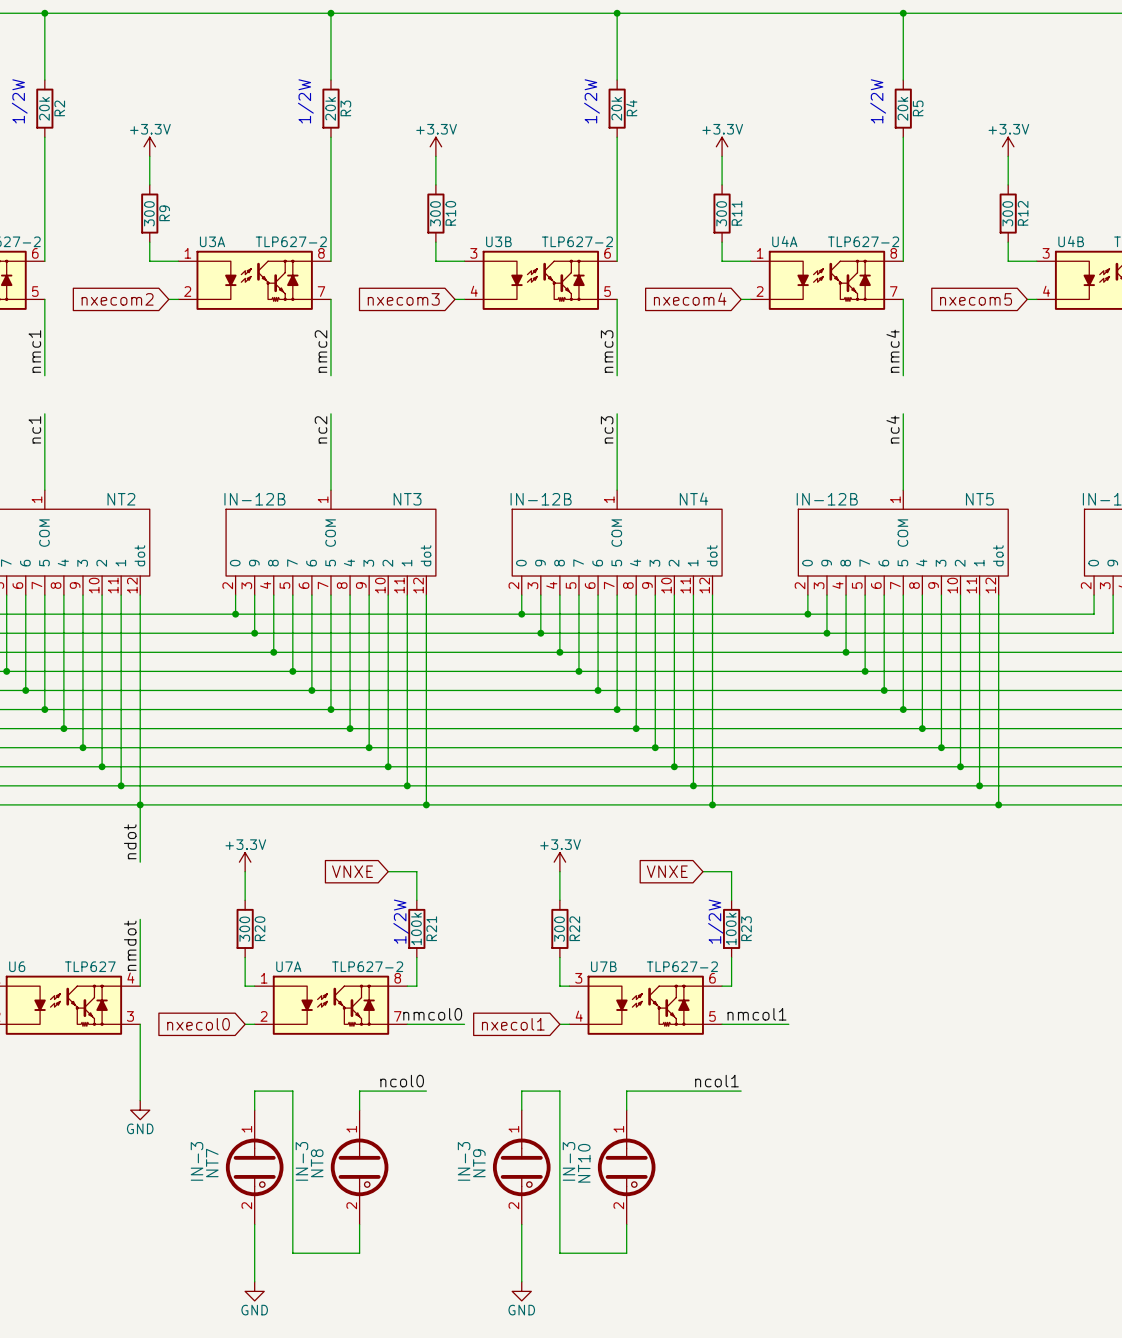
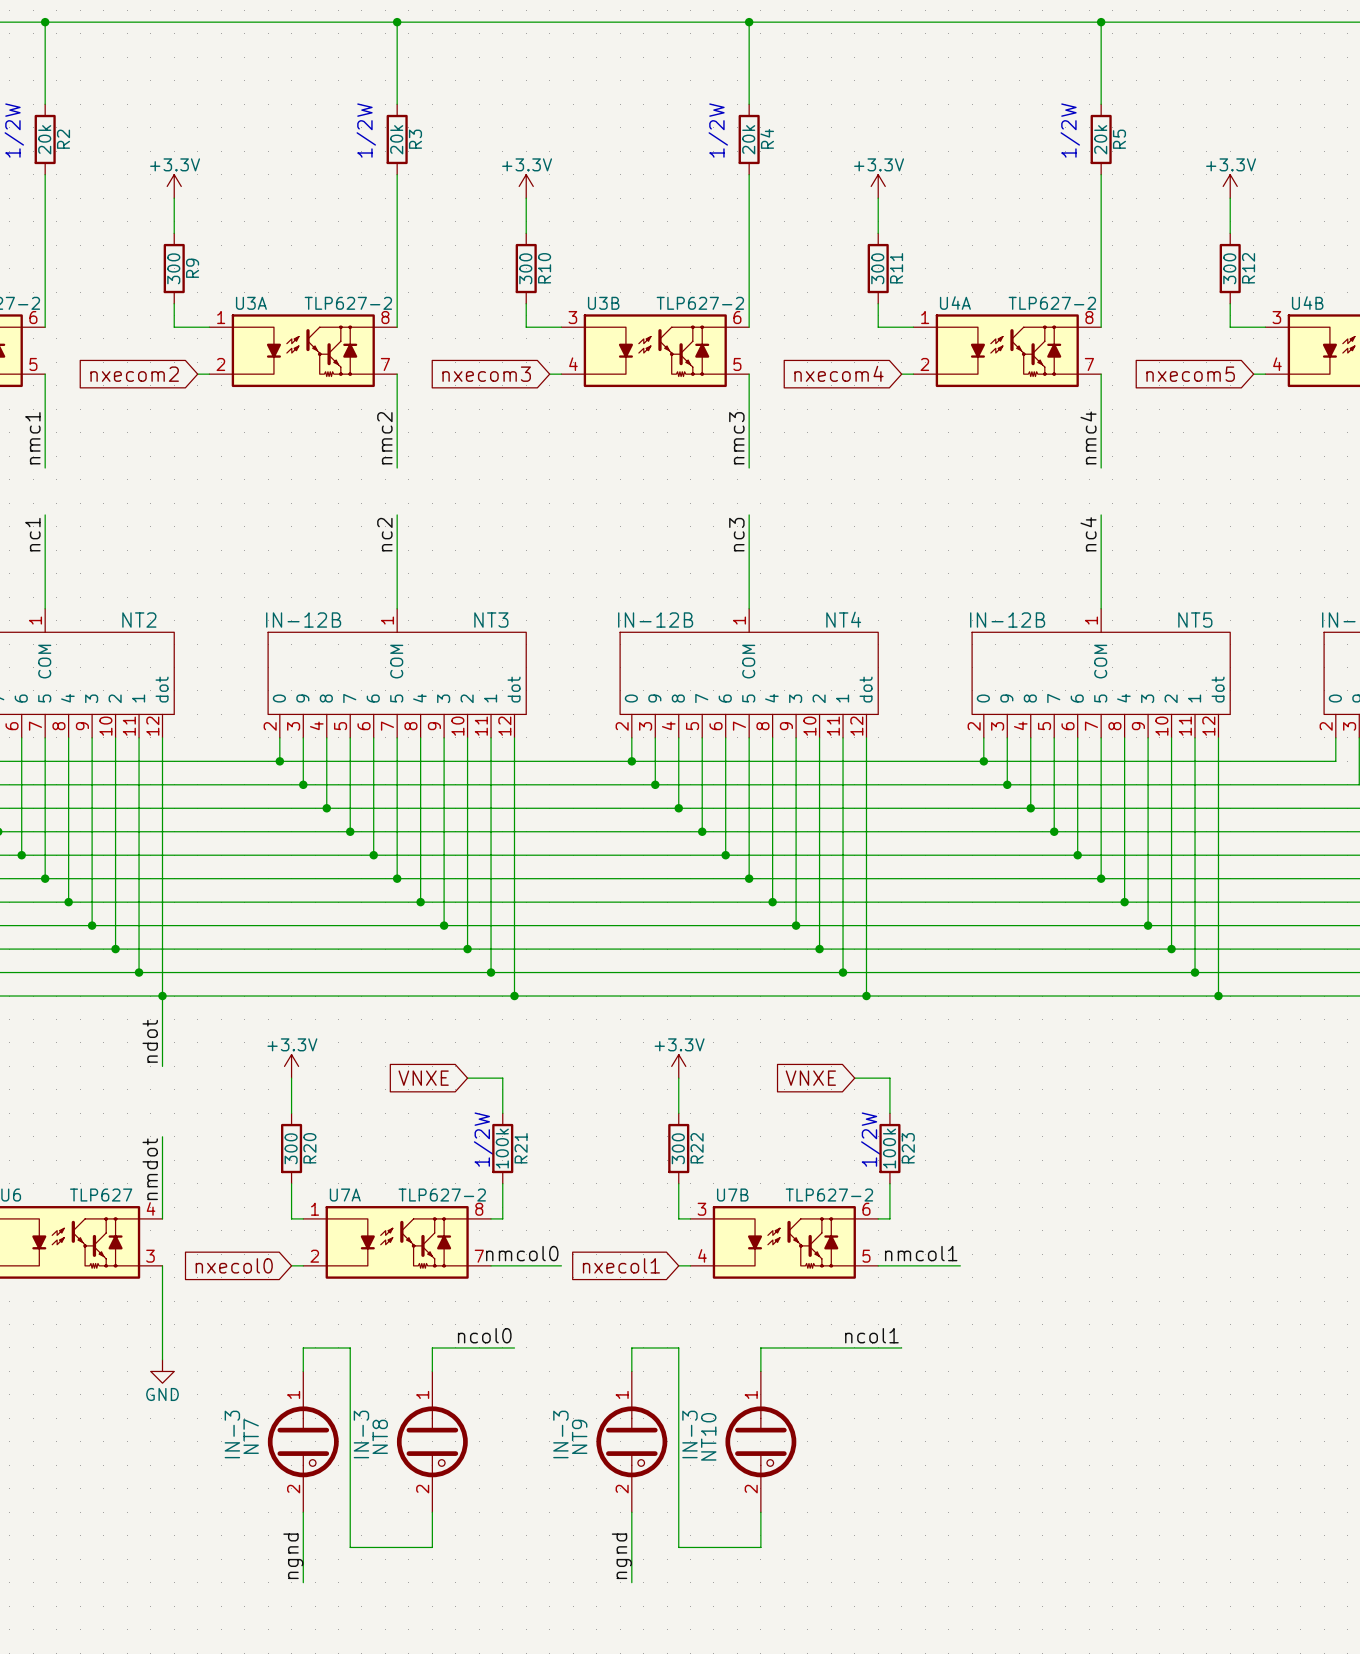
label: none -> ngnd (293, 1556)
label: none -> ngnd (621, 1556)
power symbol: GND (254, 1291) -> none
power symbol: GND (521, 1291) -> none

